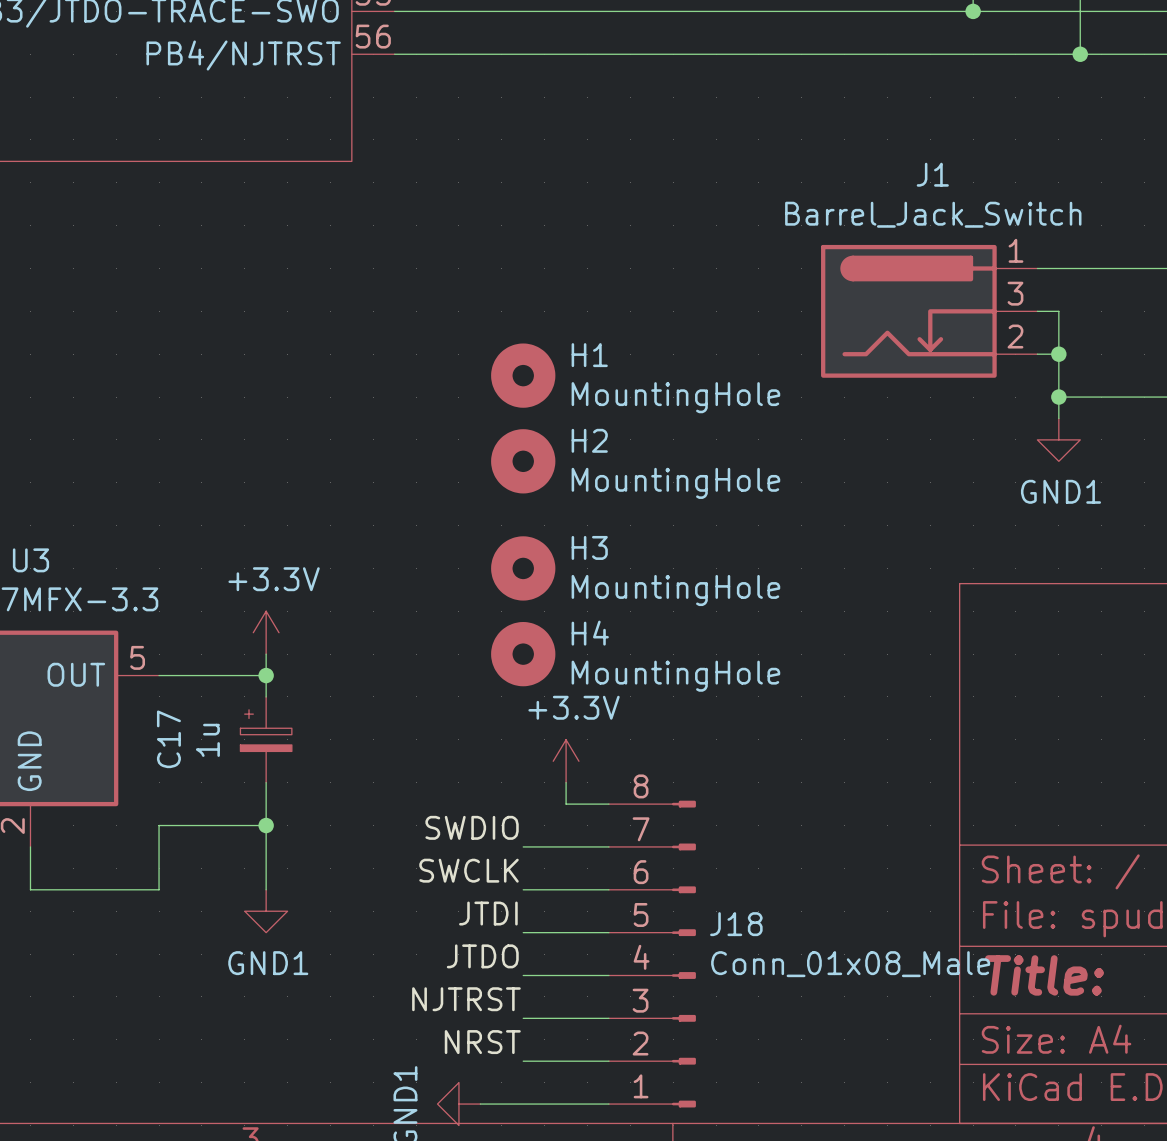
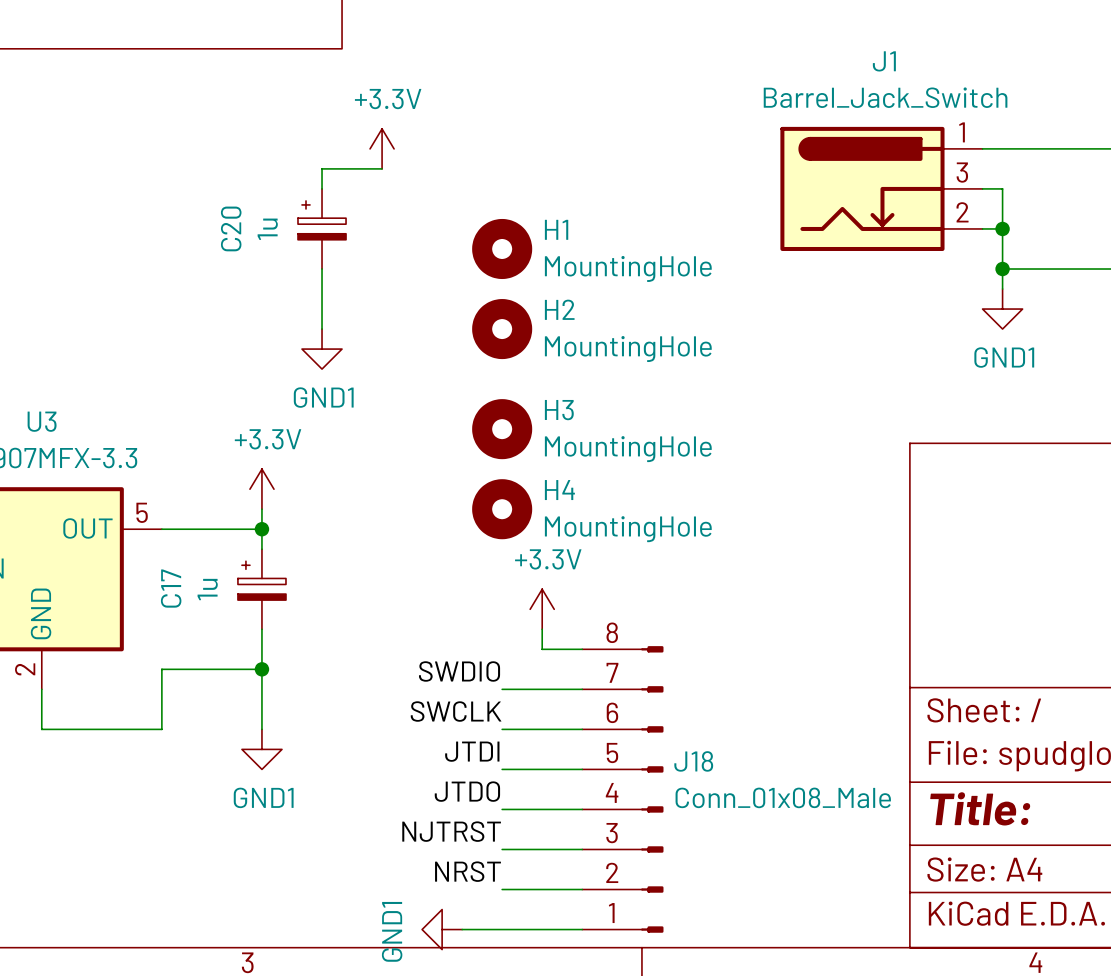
power symbol: none -> +3.3V (382, 148)
wire: none -> (382, 168) (322, 168) (322, 188)
C20: none -> 1u (322, 228)
wire: none -> (322, 269) (322, 329)
power symbol: none -> GND1 (322, 349)

